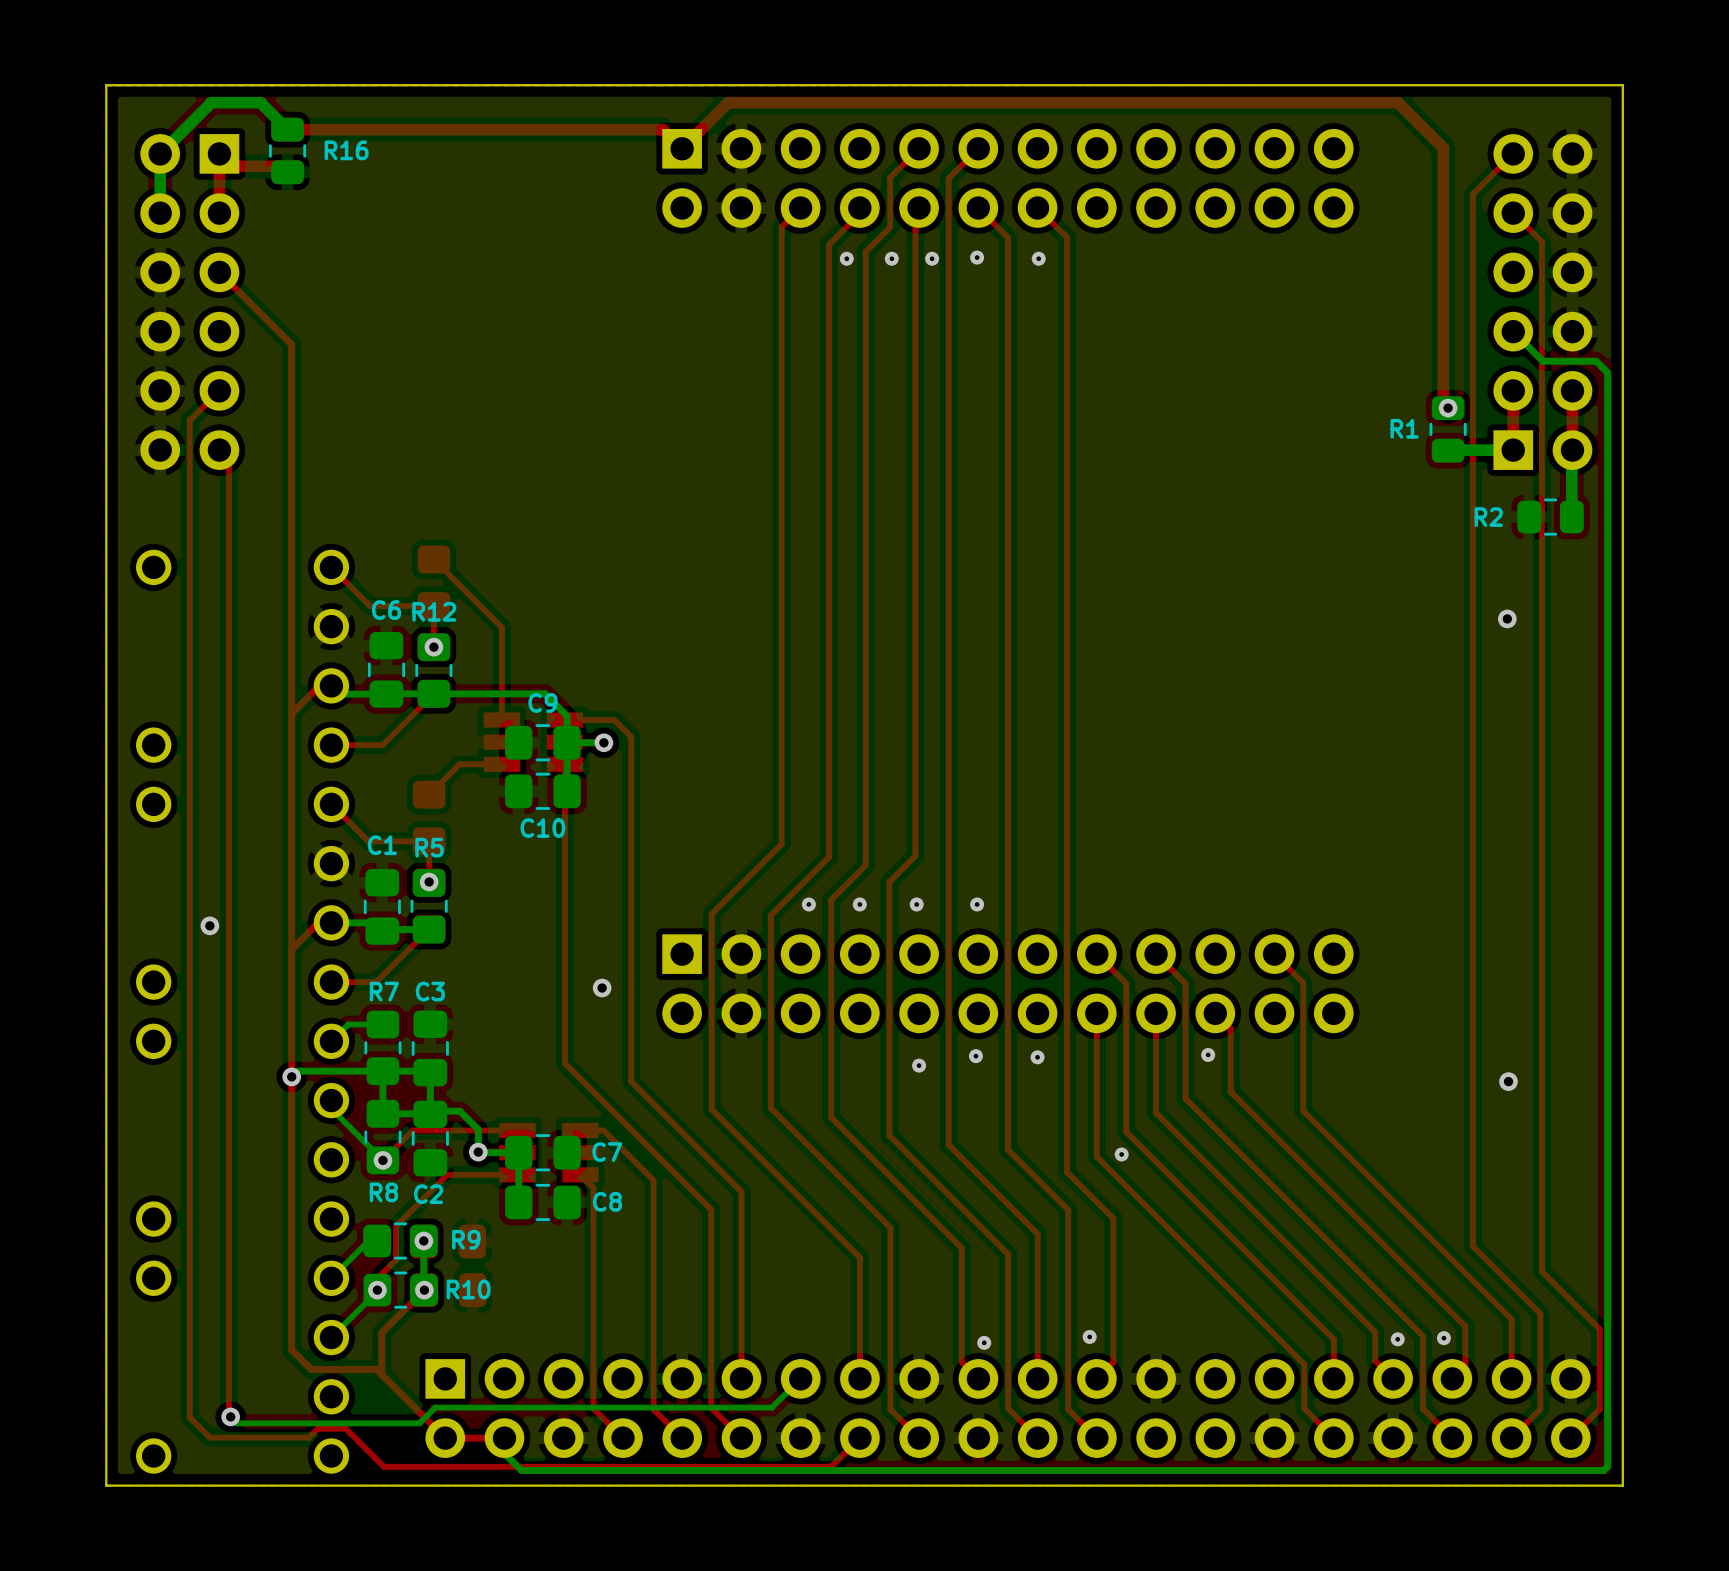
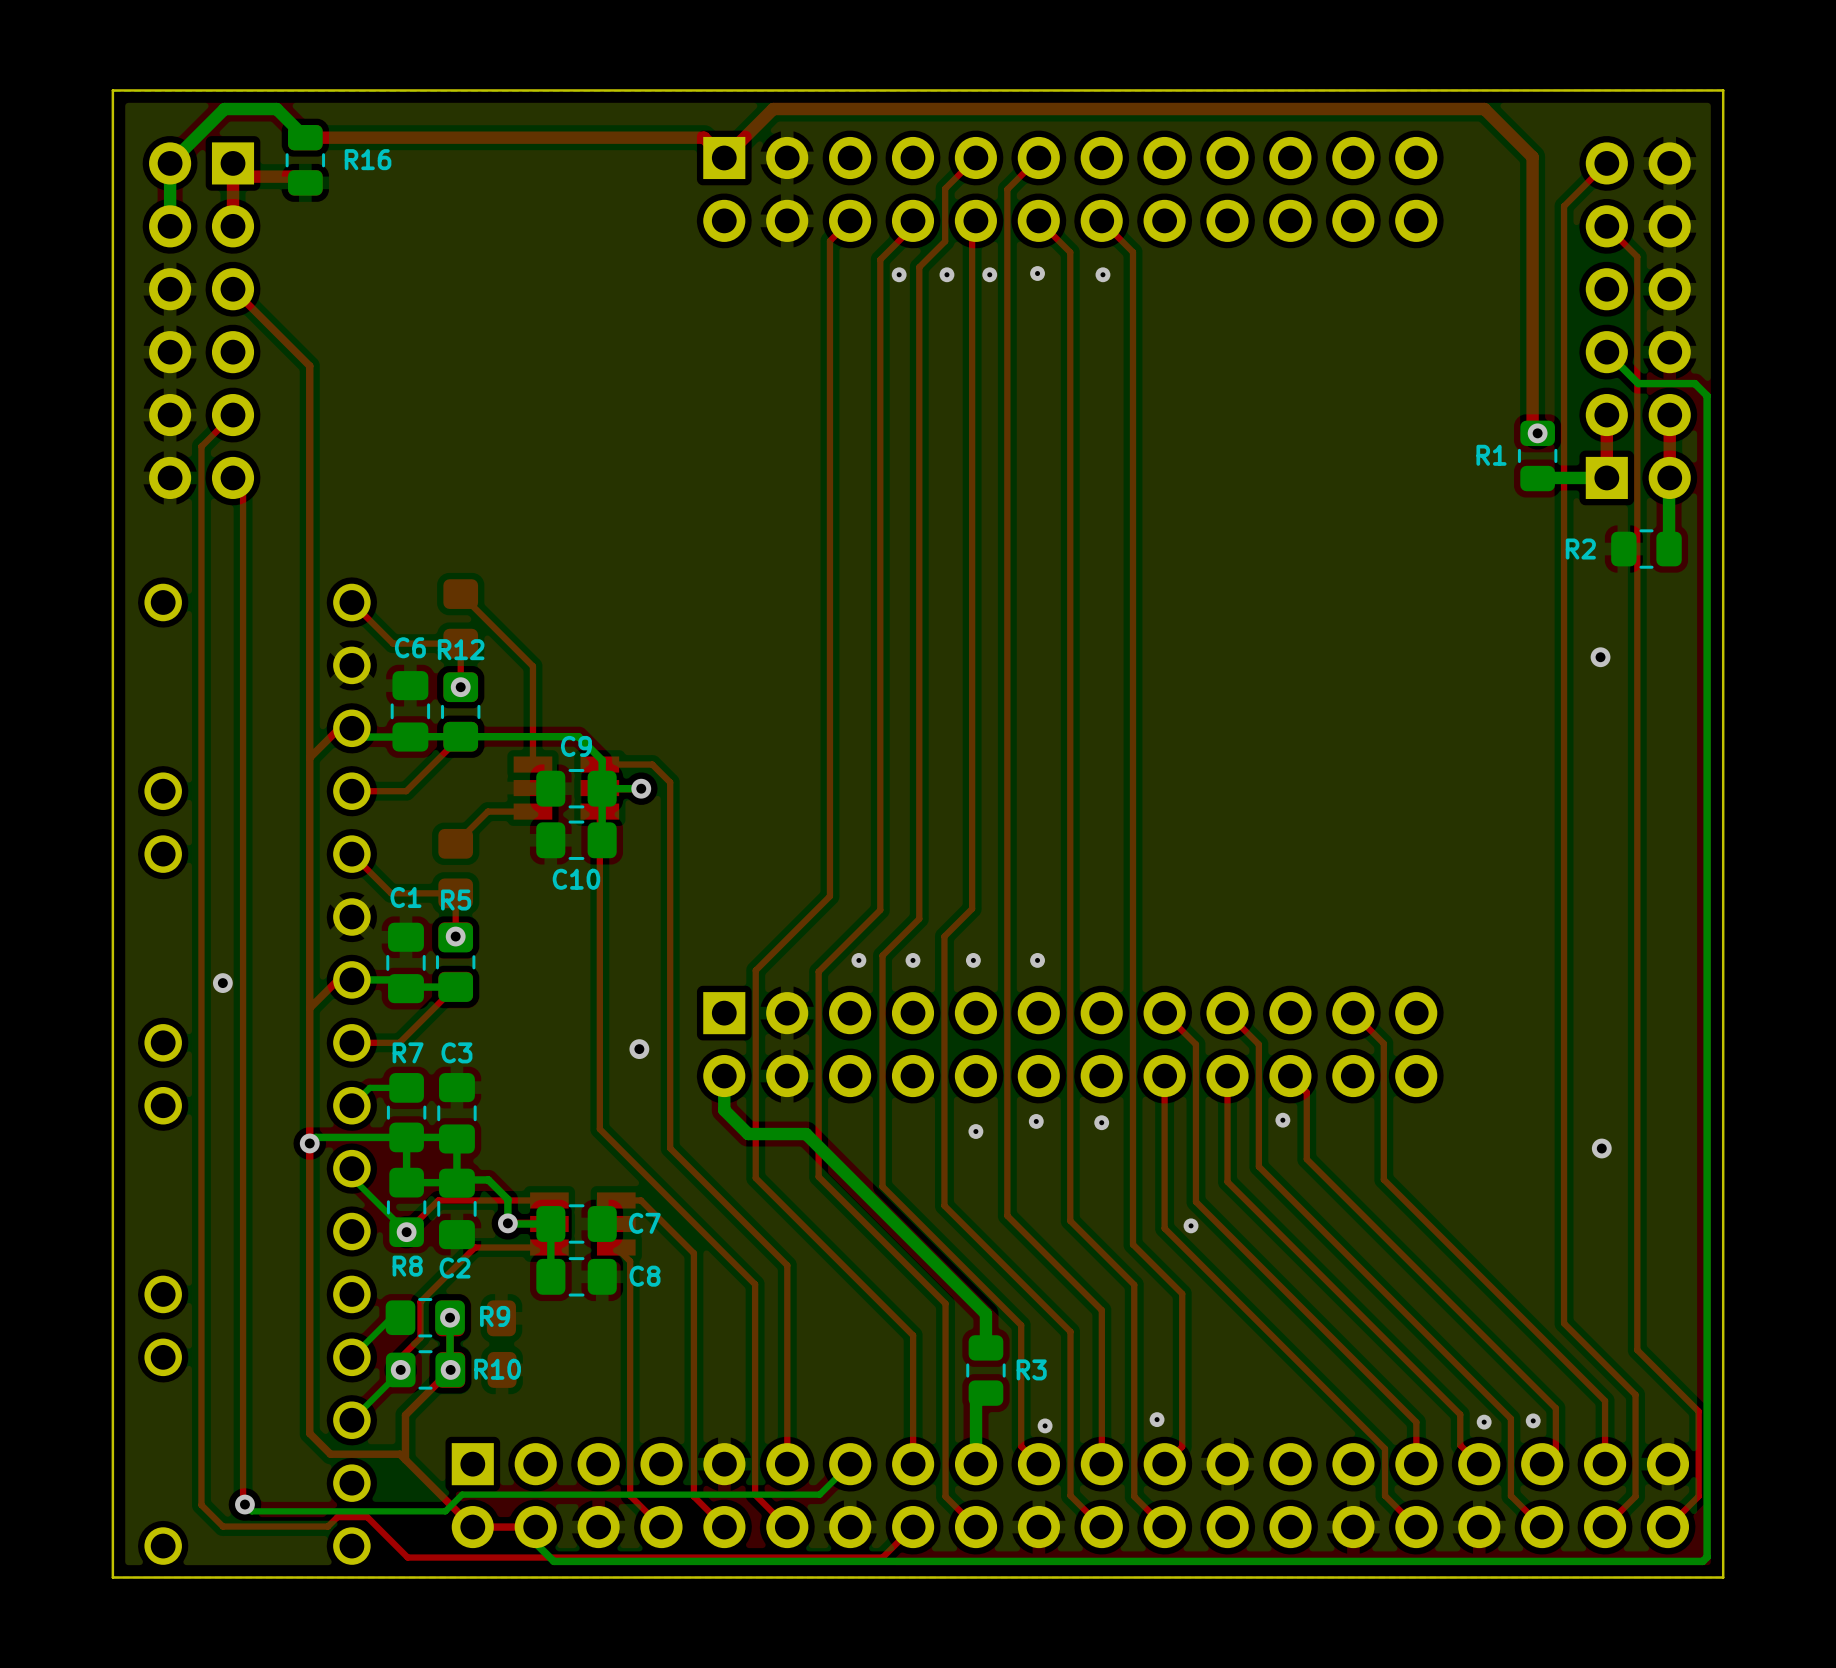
bottom track: none -> (724, 1076) (724, 1110) (748, 1134) (806, 1134) (985, 1313) (985, 1347)
R3: none -> (985, 1370)
bottom track: none -> (985, 1393) (976, 1403) (976, 1464)

